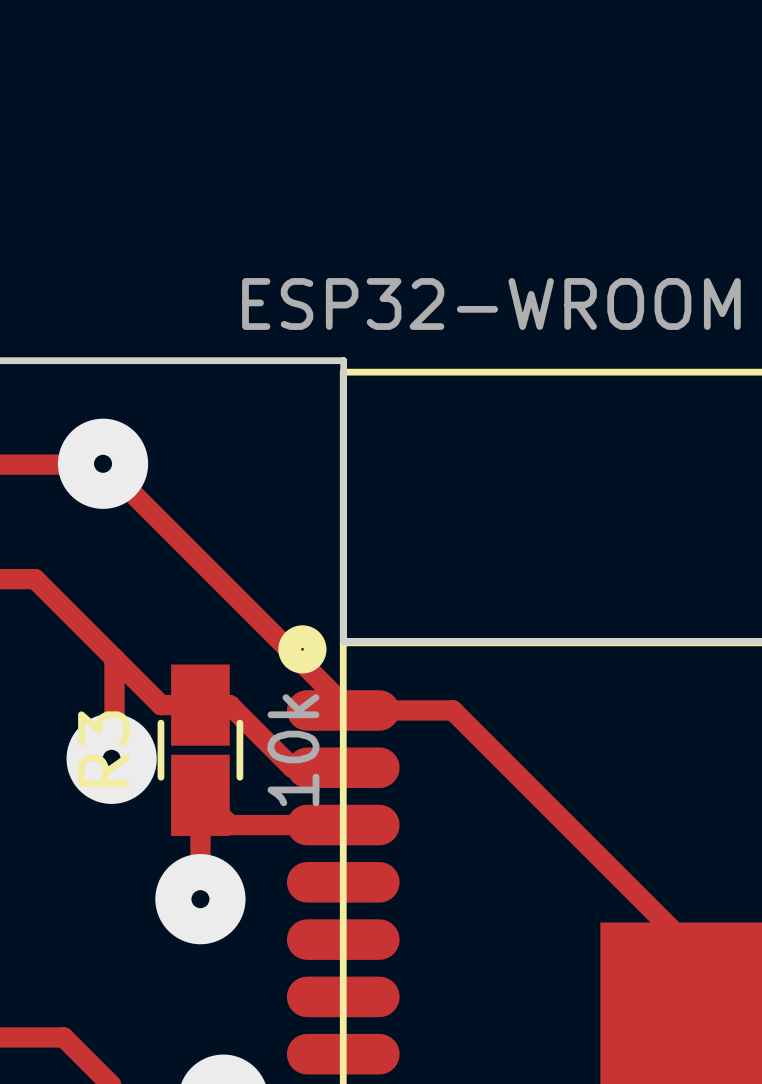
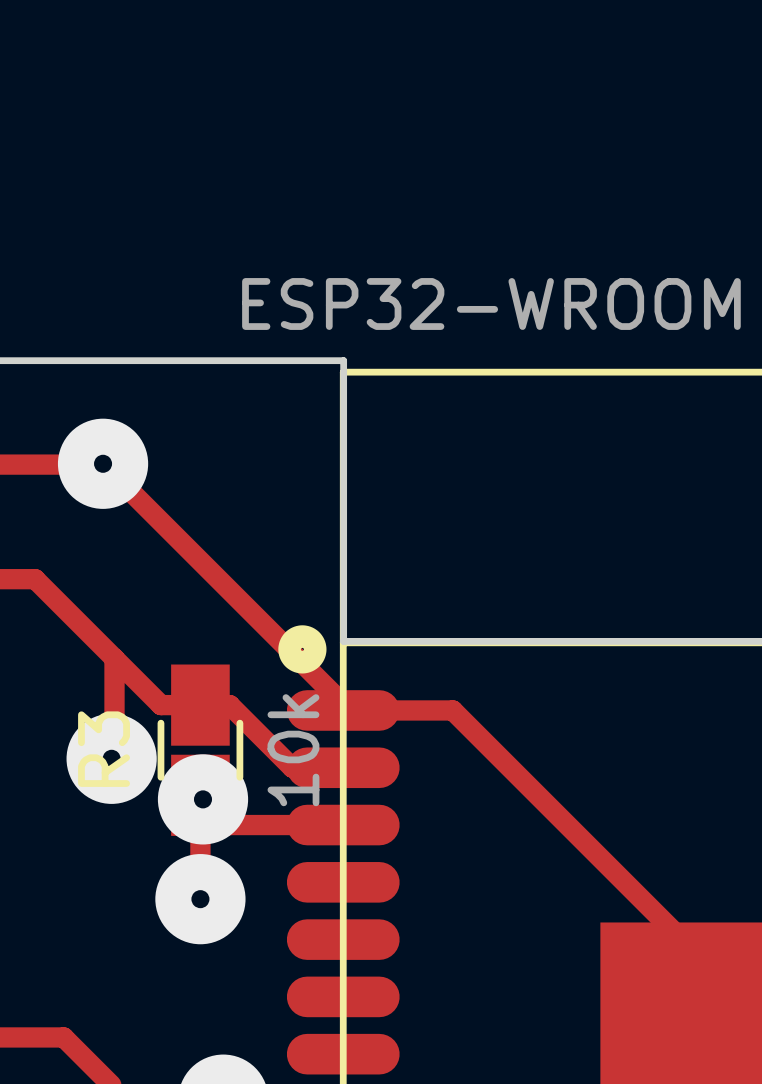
via: none -> (203, 799)

